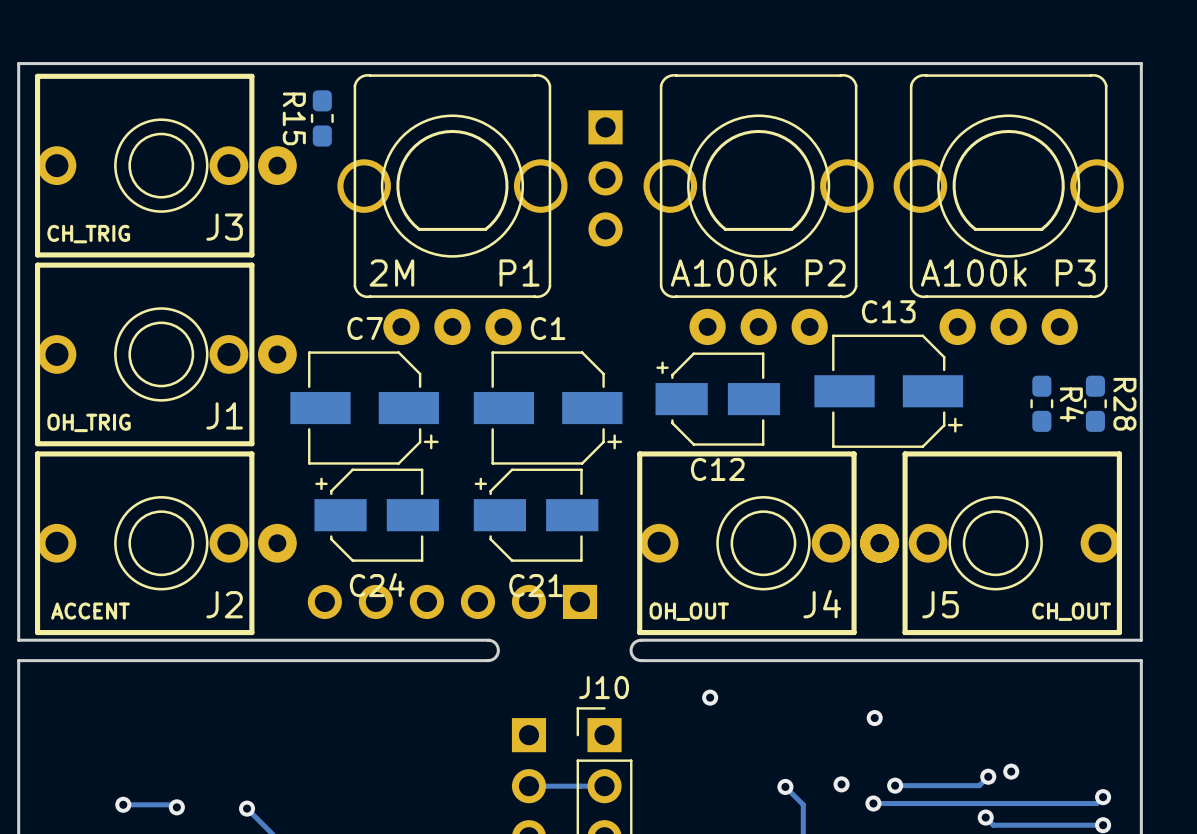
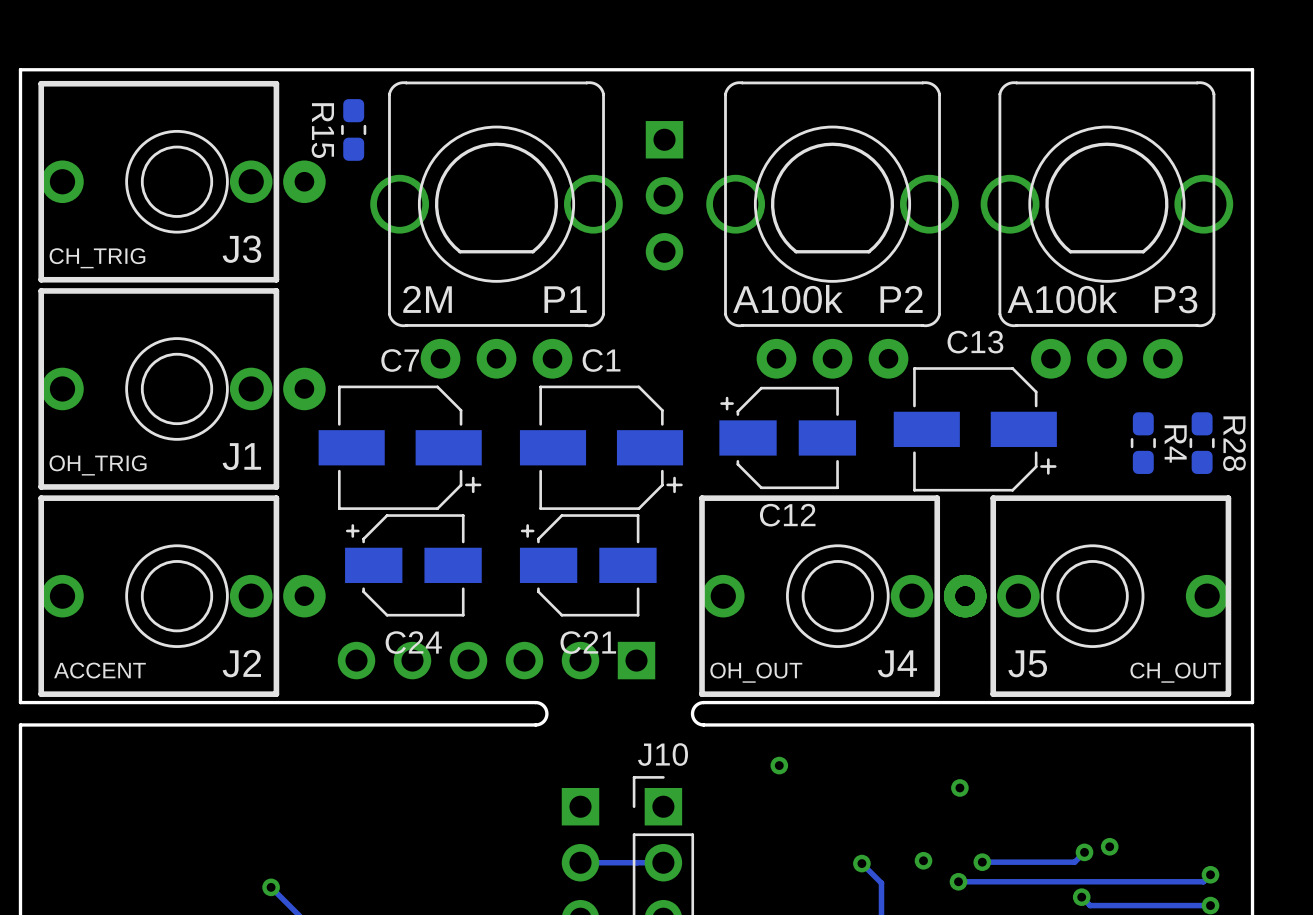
track: (123, 804) (174, 804) (176, 807) -> none
via: (123, 804) -> none
via: (176, 807) -> none

